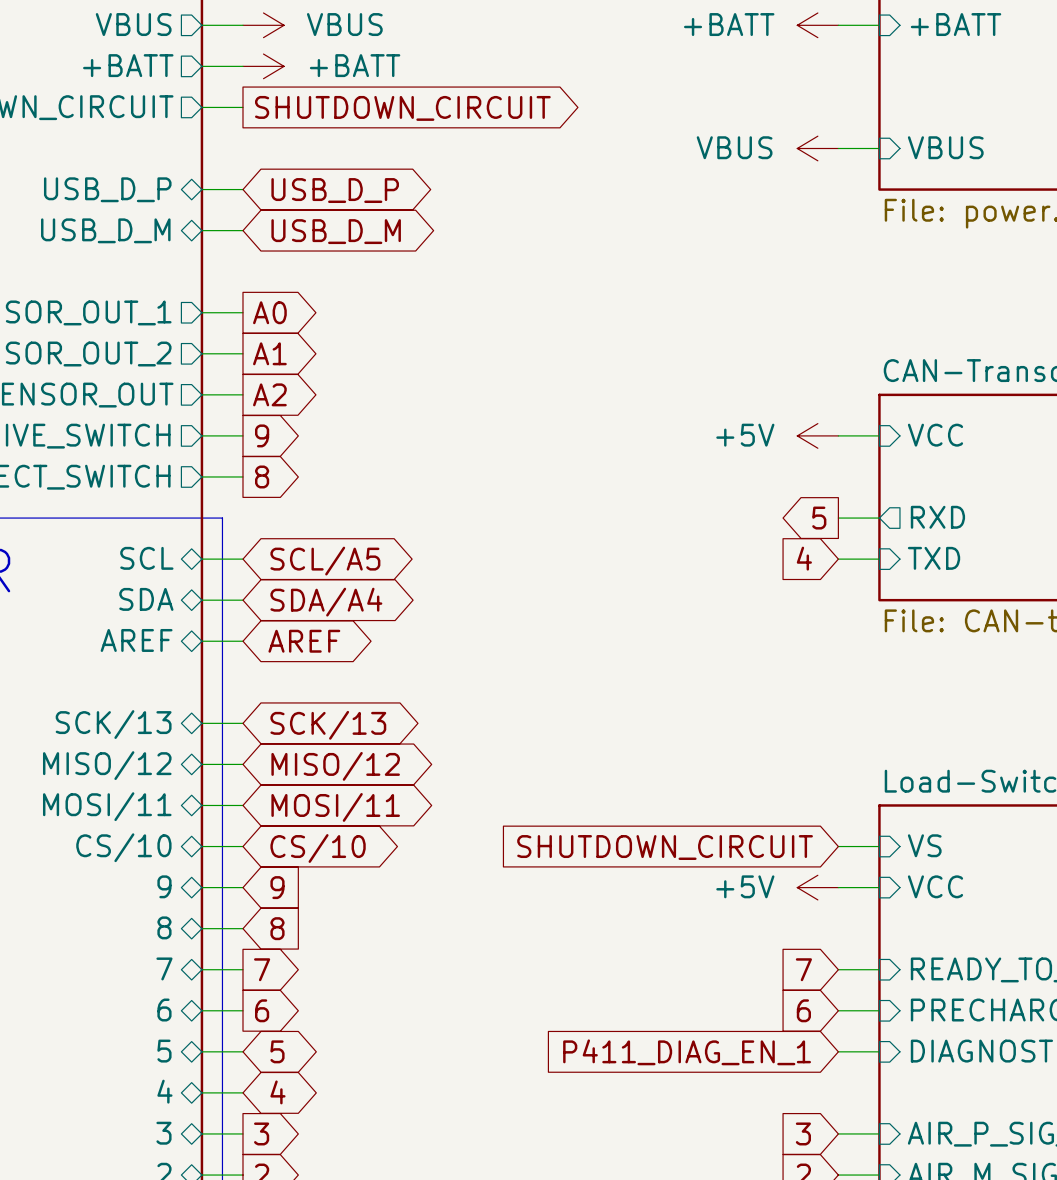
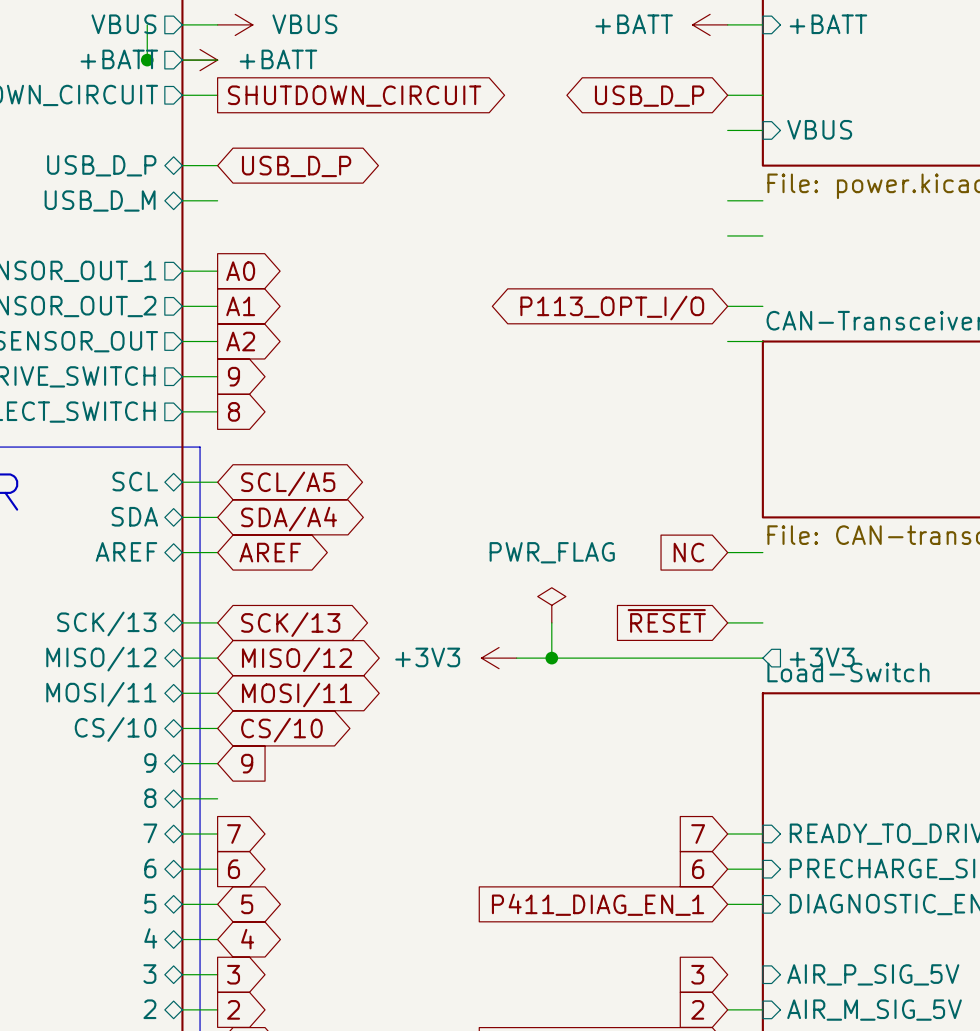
wire: none -> (147, 24) (147, 60)
junction: none -> (147, 60)
power symbol position: +BATT (263, 66) -> +BATT (200, 60)
wire: none -> (727, 95) (762, 95)
global label: none -> USB_D_P (649, 96)
power symbol: VBUS (817, 148) -> none
wire: none -> (727, 200) (762, 200)
global label: USB_D_M (336, 231) -> none
global label: none -> P113_OPT_I/O (612, 308)
power symbol: +5V (817, 435) -> none
wire: (838, 435) (879, 435) -> (727, 235) (762, 235)
sheet pin: VCC (935, 435) -> none
sheet pin: RXD (937, 517) -> none
global label: 5 (819, 518) -> none
wire: (838, 518) (879, 518) -> (727, 306) (762, 306)
global label: 4 (804, 558) -> none
sheet pin: TXD (934, 558) -> none
wire: (838, 559) (879, 559) -> (727, 341) (762, 341)
global label: none -> NC (688, 552)
power symbol: none -> PWR_FLAG (551, 605)
global label: none -> ~{RESET} (666, 620)
wire: none -> (551, 622) (551, 658)
sheet pin: none -> +3V3 (822, 657)
power symbol: none -> +3V3 (499, 658)
wire: none -> (516, 658) (762, 658)
junction: none -> (551, 658)
sheet pin: VS (924, 845) -> none
wire: (838, 846) (879, 846) -> (727, 552) (762, 552)
global label: SHUTDOWN_CIRCUIT (665, 847) -> none
sheet pin: VCC (935, 886) -> none
power symbol: +5V (817, 887) -> none
wire: (838, 887) (879, 887) -> (727, 622) (762, 622)
global label: 8 (277, 928) -> none
wire: (838, 1133) (879, 1133) -> none

